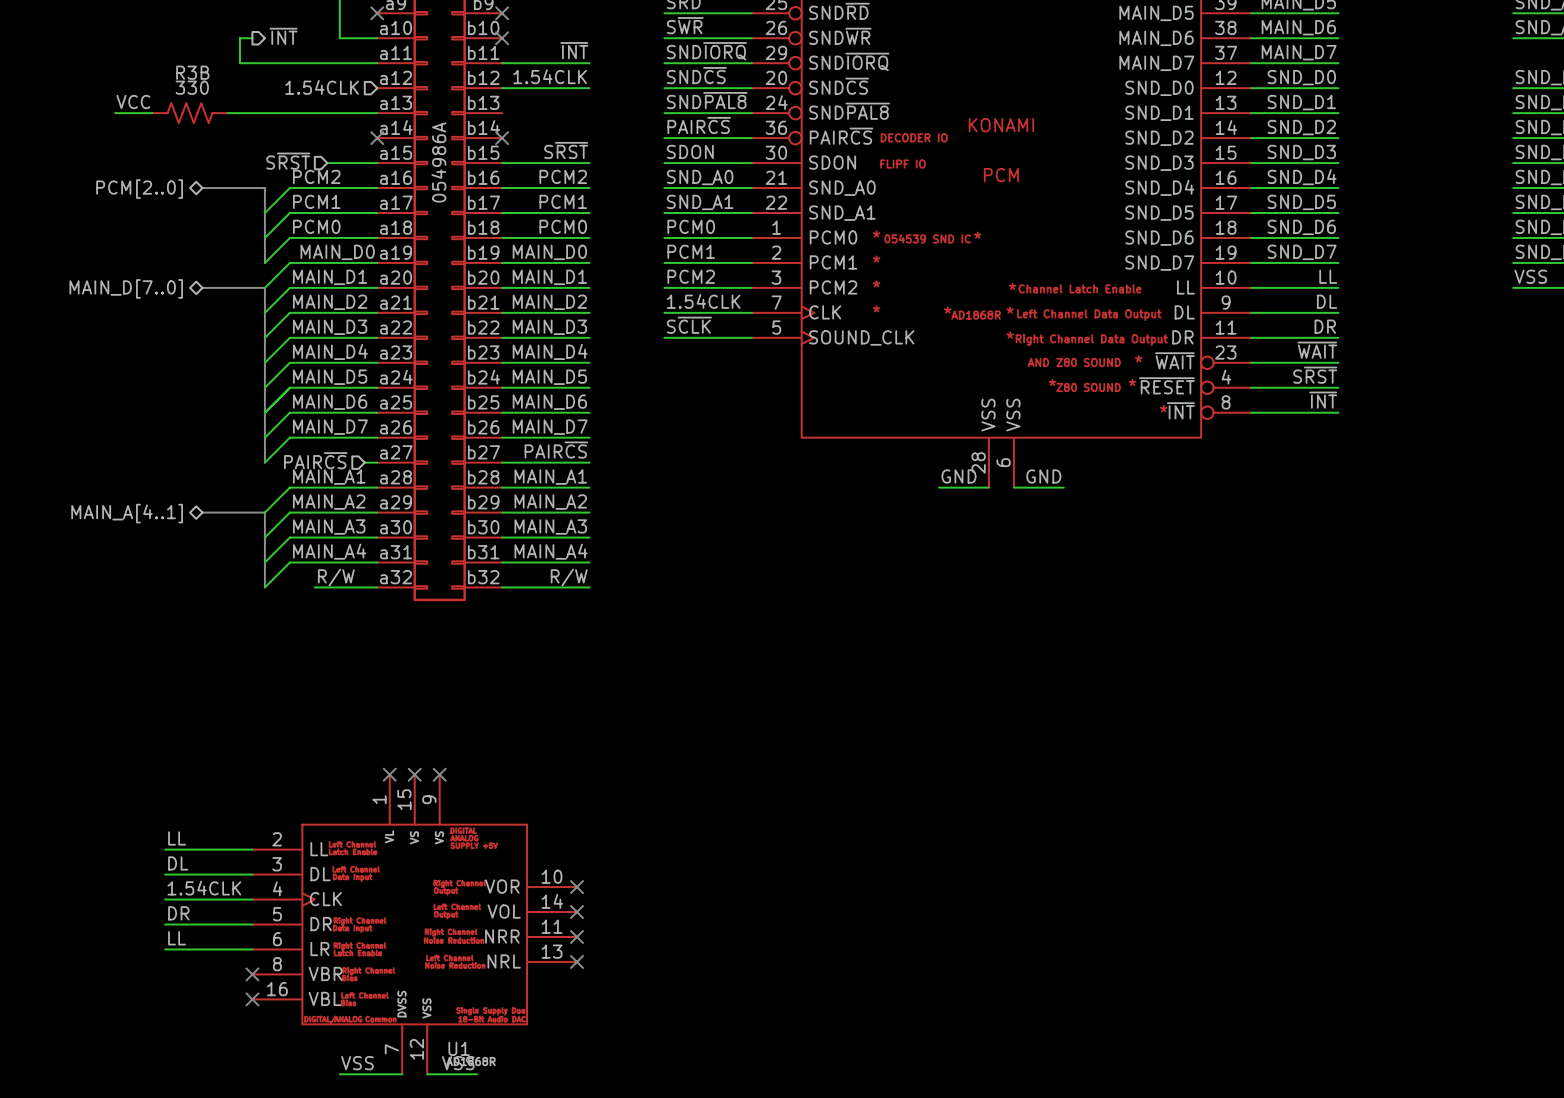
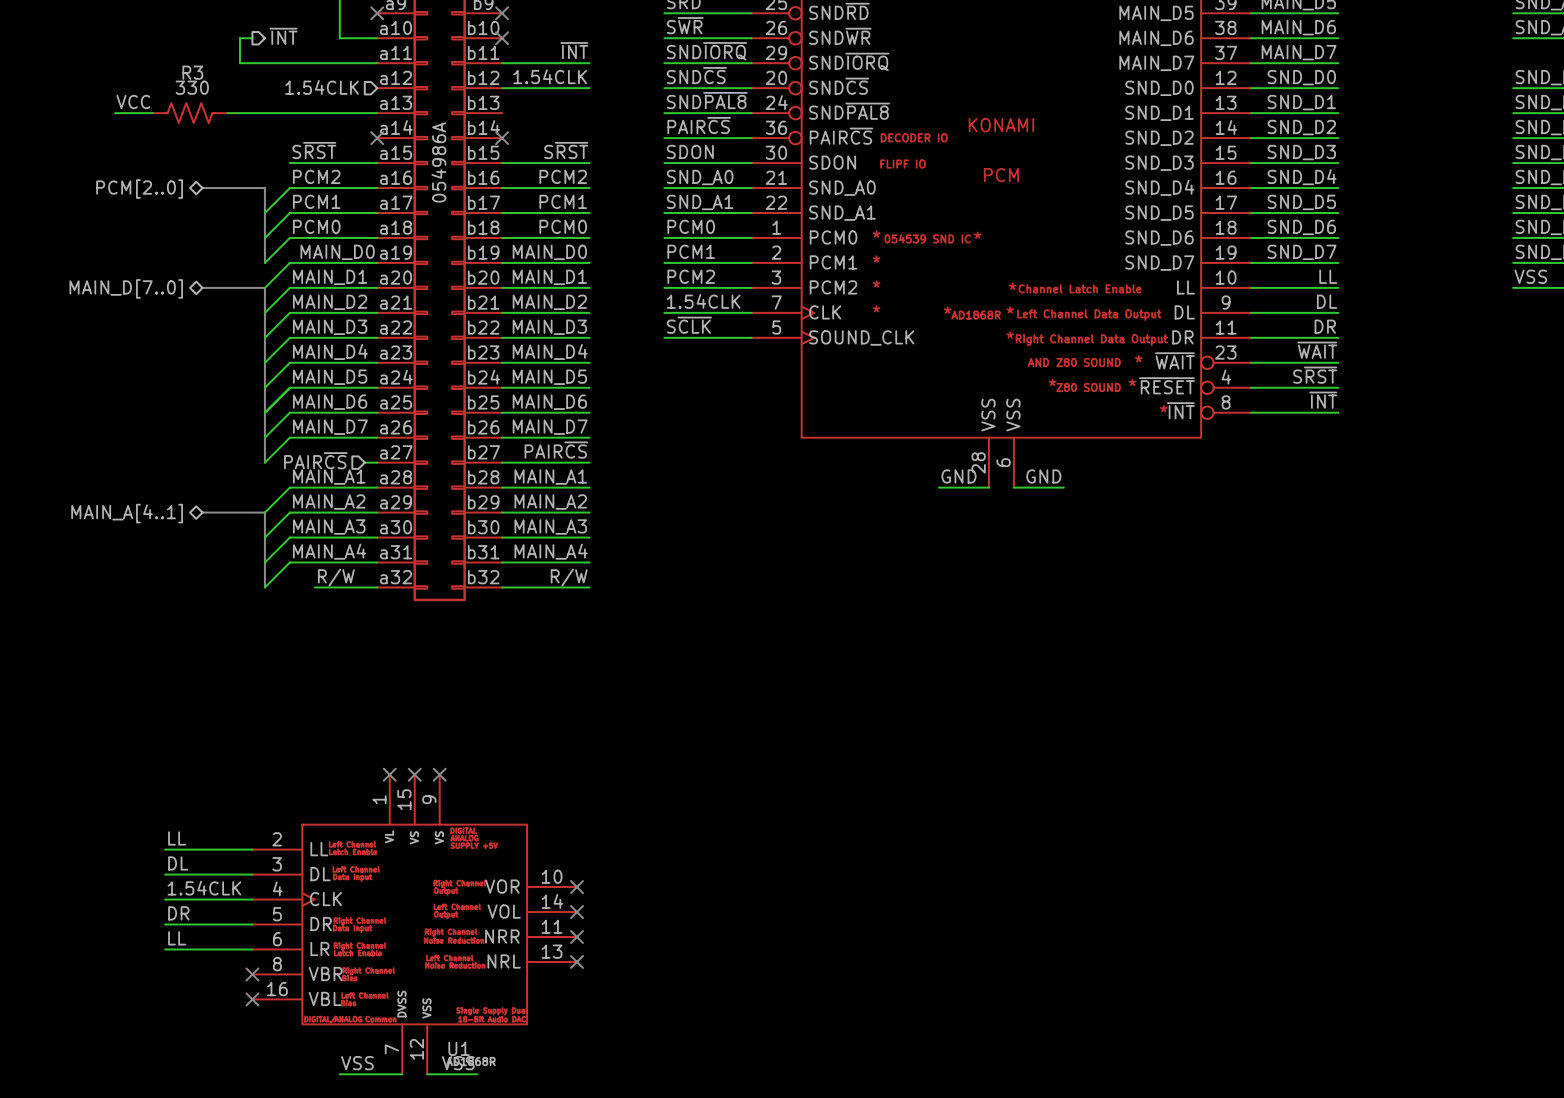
R3B name: R3B (192, 72) -> R3 (192, 72)
label: none -> S~{RST} (314, 150)
hierarchical label: S~{RST} (288, 161) -> none
wire: none -> (289, 163) (327, 163)

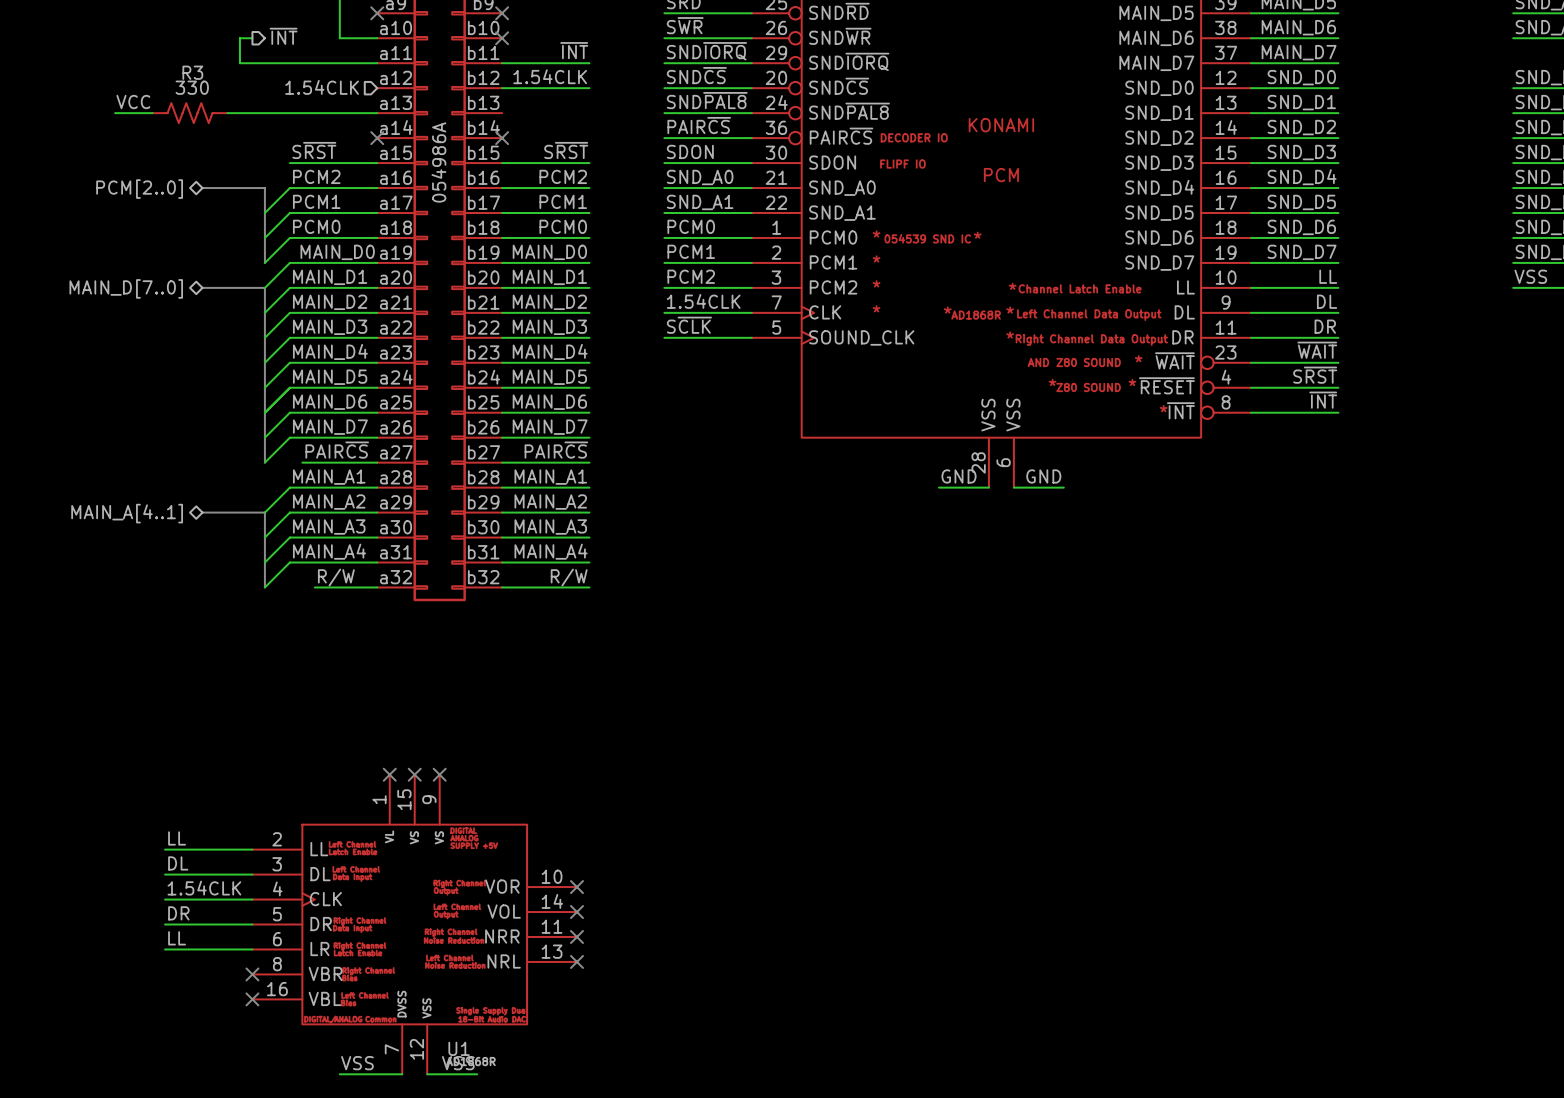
label: none -> PAIR~{CS} (337, 450)
hierarchical label: PAIR~{CS} (315, 460) -> none
wire: none -> (302, 462) (364, 462)

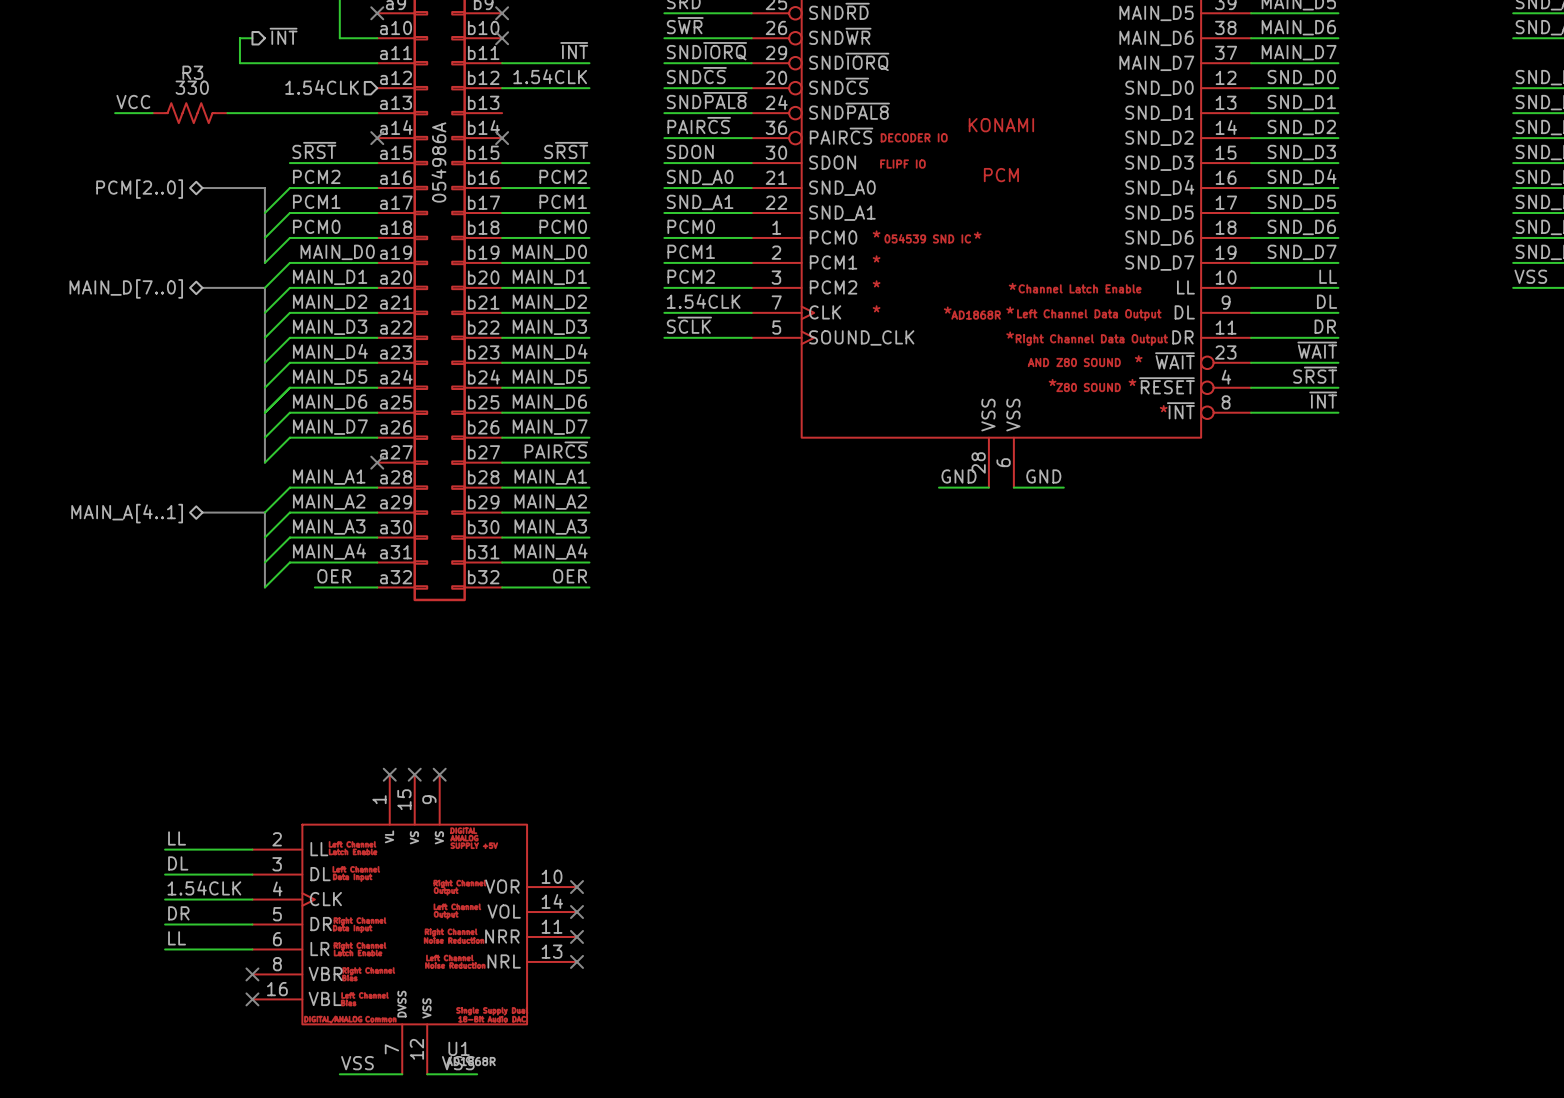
label: PAIR~{CS} (337, 450) -> none
wire: (302, 462) (377, 462) -> none
no-connect mark: none -> (377, 462)
label: R/W (336, 577) -> OER (334, 576)
label: R/W (569, 577) -> OER (570, 576)

